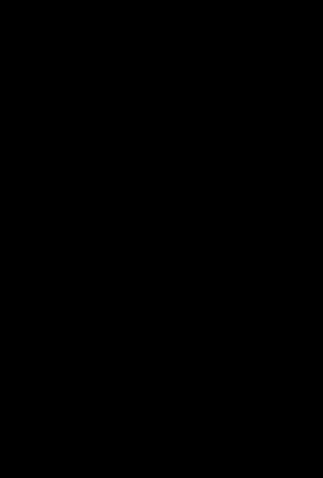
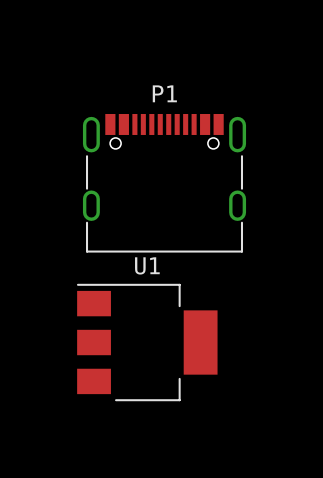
P1: none -> (164, 183)
U1: none -> (147, 342)

